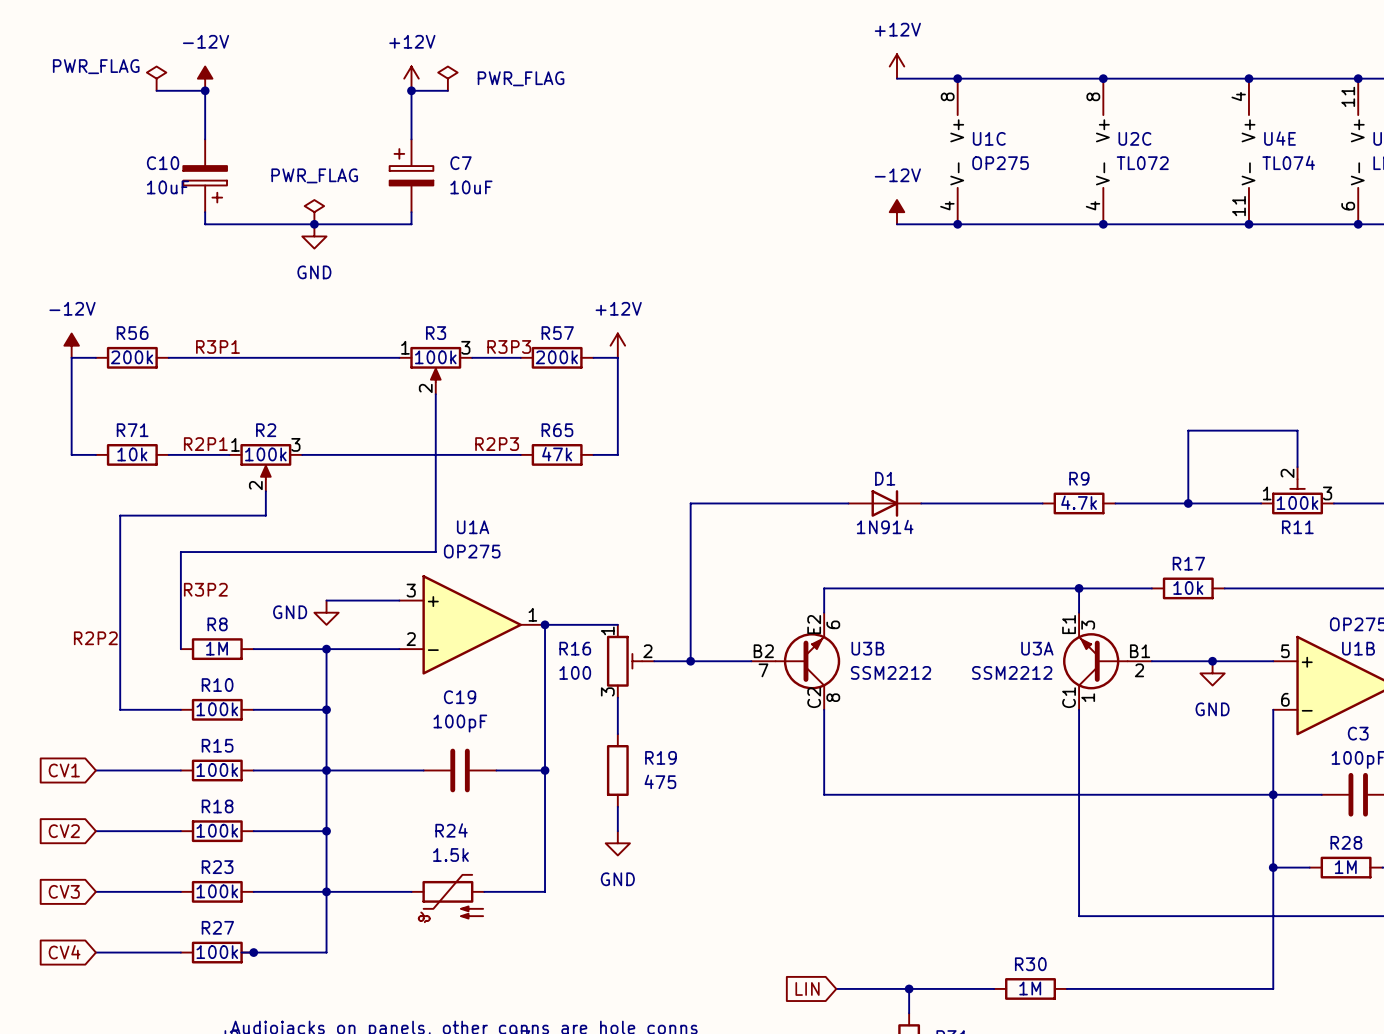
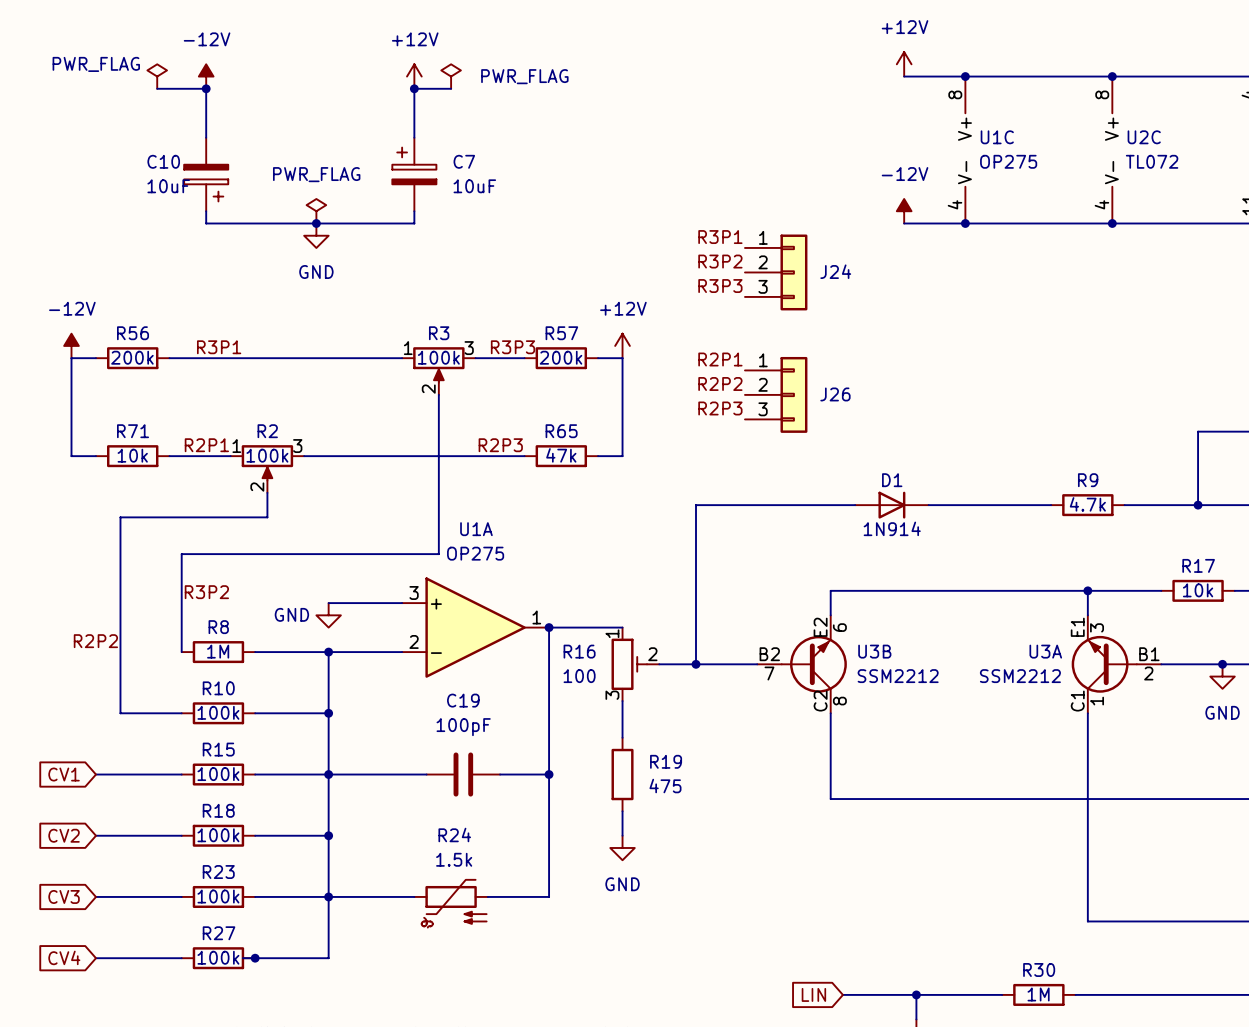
label: none -> R3P1 (720, 237)
label: none -> R3P2 (720, 261)
J24: none -> (776, 272)
label: none -> R3P3 (720, 286)
label: none -> R2P1 (720, 359)
label: none -> R2P2 (720, 383)
J26: none -> (776, 394)
label: none -> R2P3 (720, 408)

